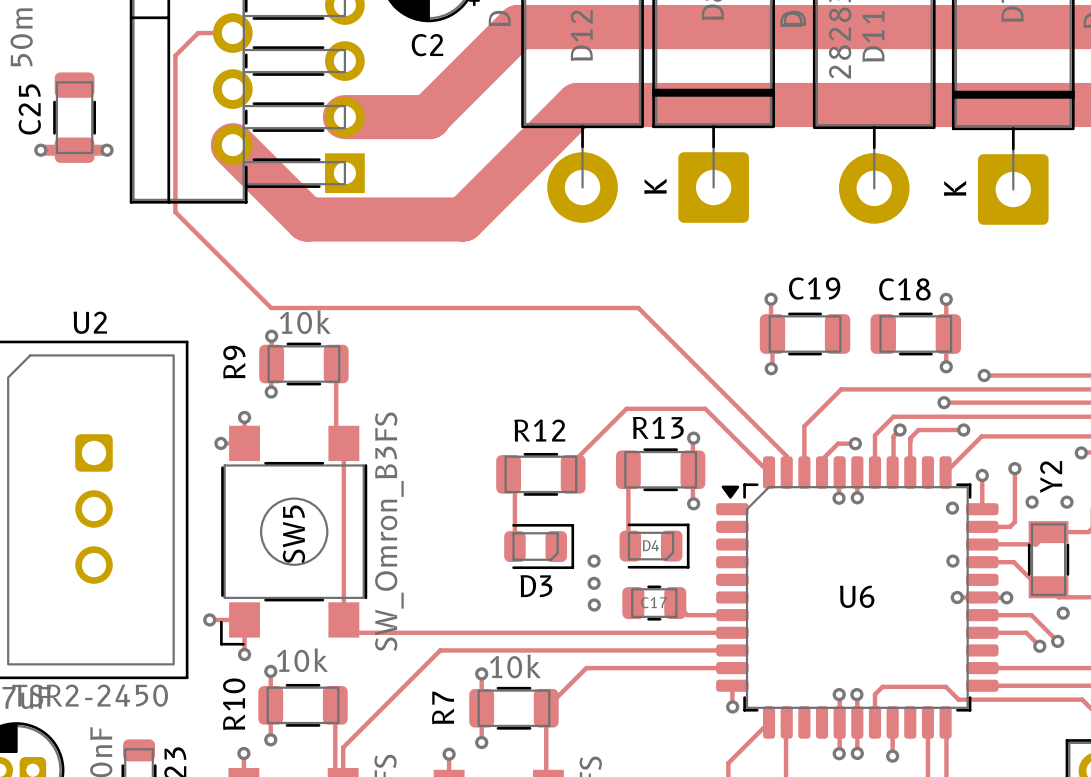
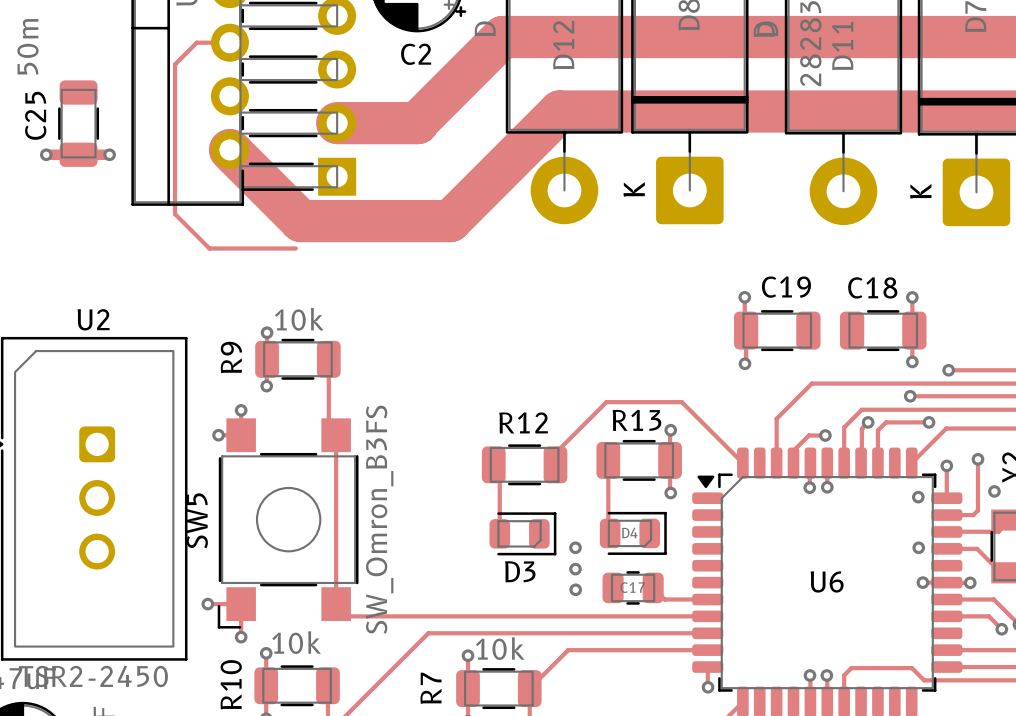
track: (211, 248) (271, 307) (638, 307) (786, 456) (786, 472) -> (209, 248) (295, 248)
SW5 name position: SW5 (293, 534) -> SW5 (197, 520)

